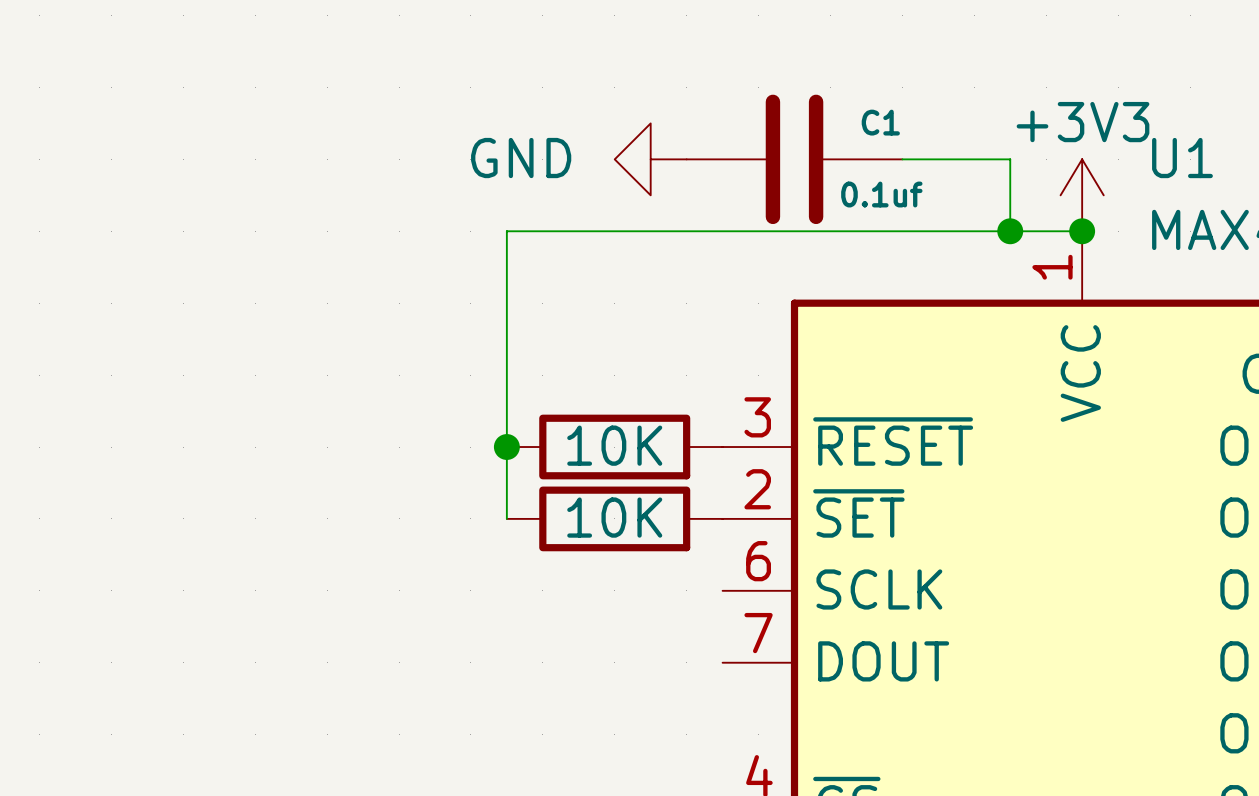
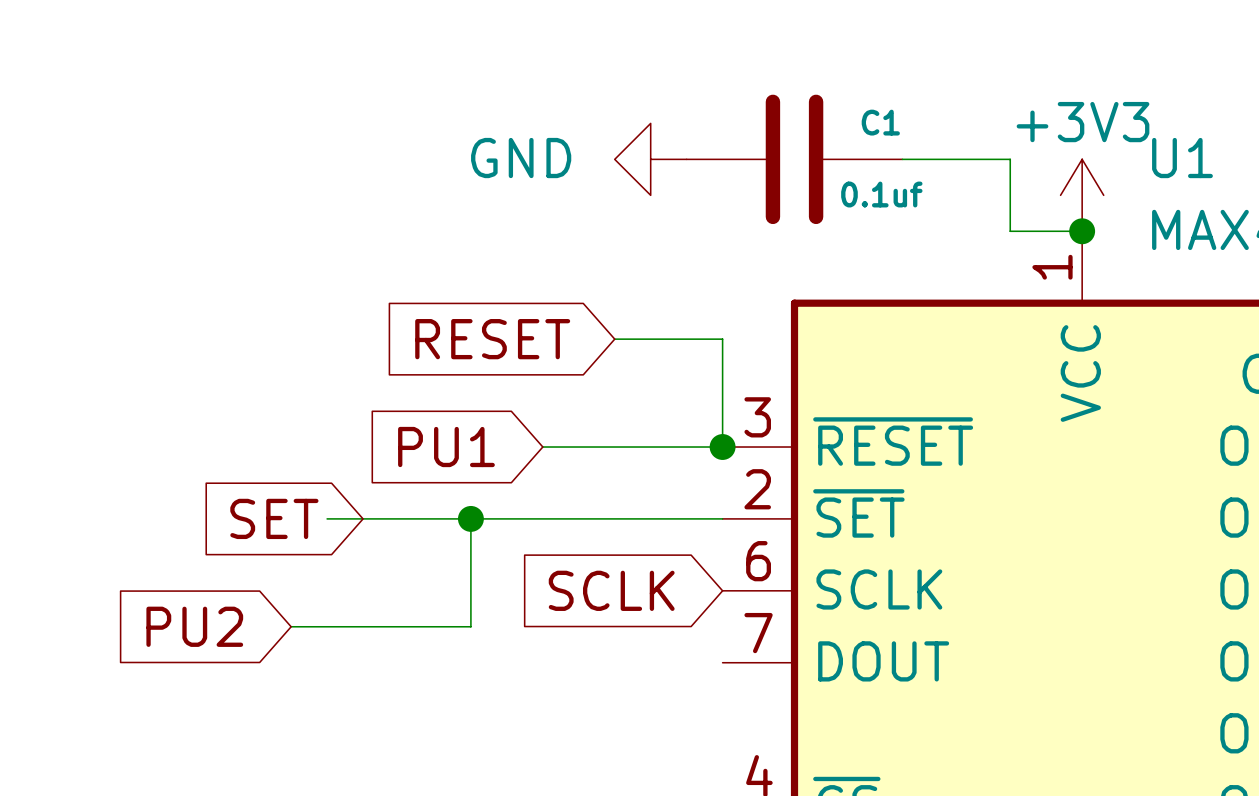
wire: (1010, 231) (506, 231) (506, 518) -> none
junction: (1010, 231) -> none
global label: none -> RESET (492, 339)
wire: none -> (614, 339) (722, 339) (722, 447) (542, 447)
global label: none -> PU1 (446, 447)
junction position: (506, 447) -> (470, 518)
part: 10K (614, 447) -> none
junction: none -> (722, 447)
global label: none -> SET (274, 518)
wire: none -> (327, 518) (722, 518)
wire: none -> (470, 518) (470, 626) (291, 626)
part: 10K (614, 518) -> none
global label: none -> SCLK (611, 590)
global label: none -> PU2 (194, 626)

